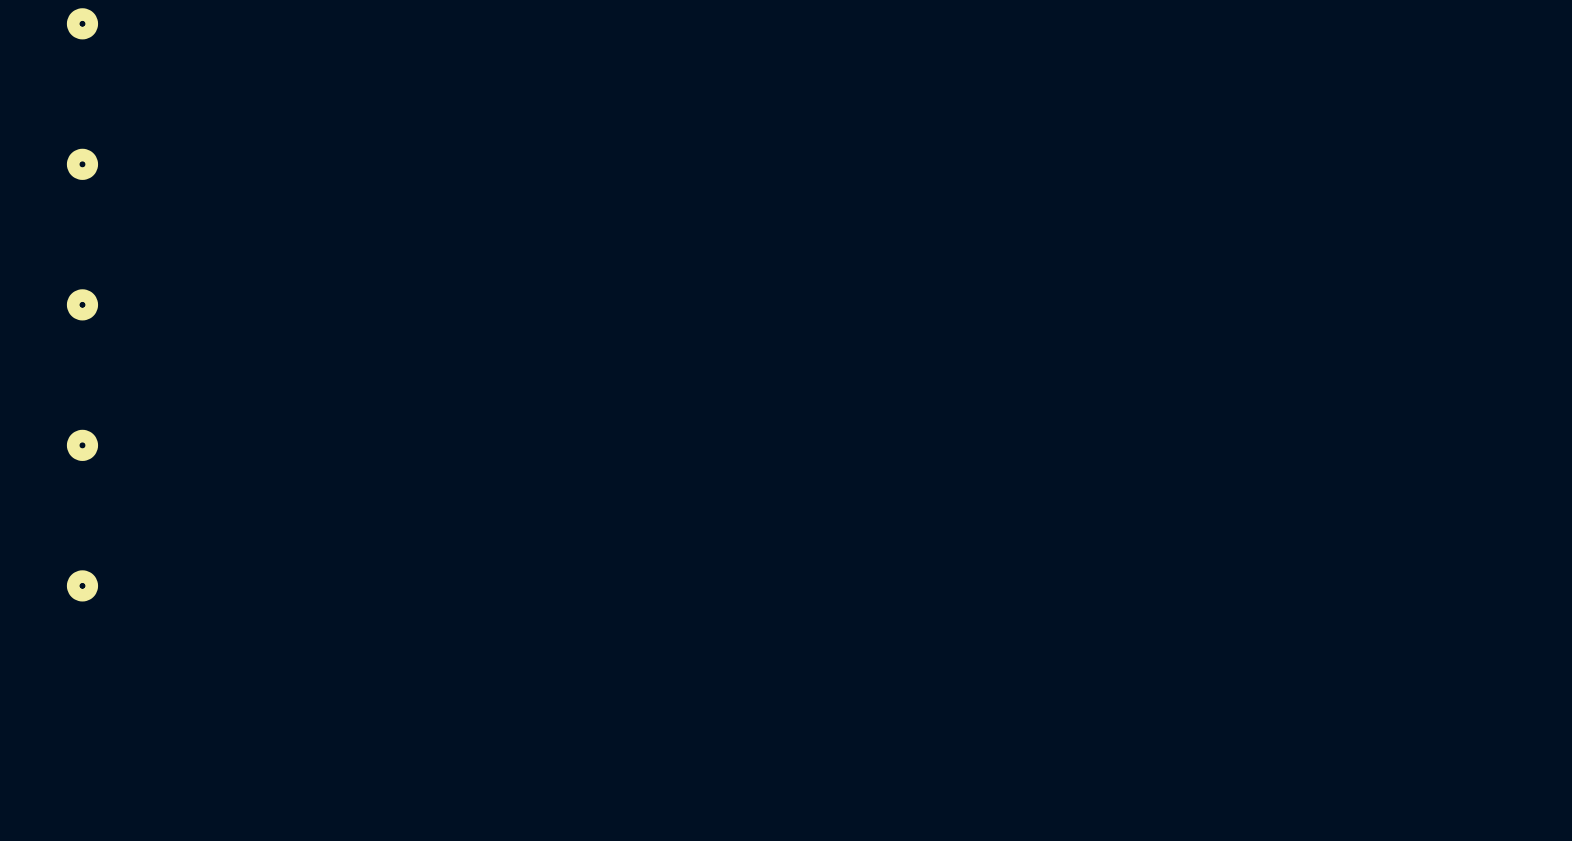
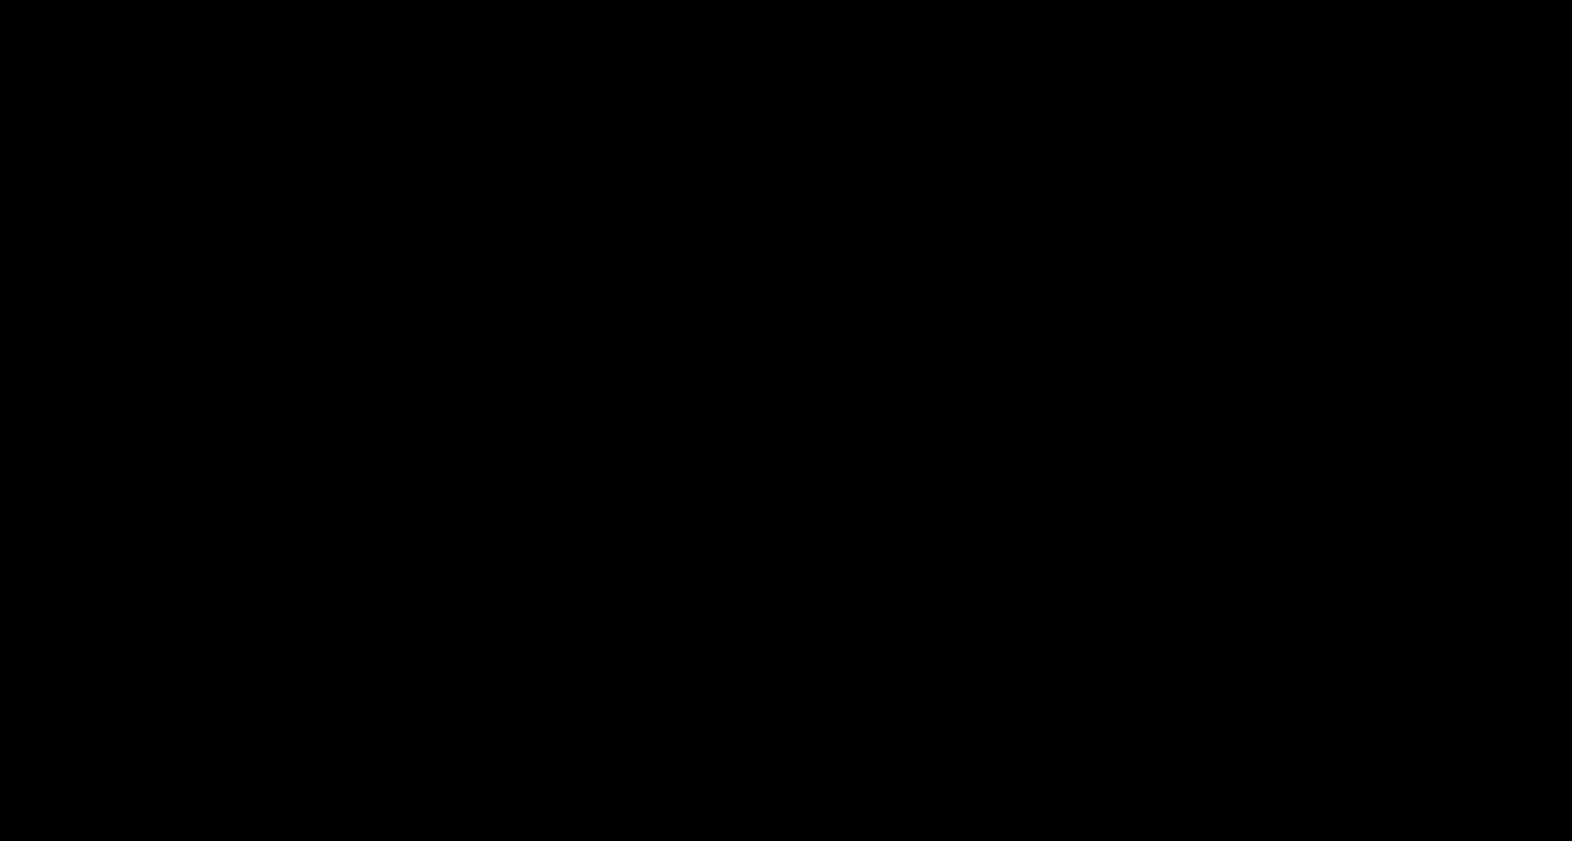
part: (82, 23) -> none
part: (82, 164) -> none
part: (82, 304) -> none
part: (82, 445) -> none
part: (82, 585) -> none

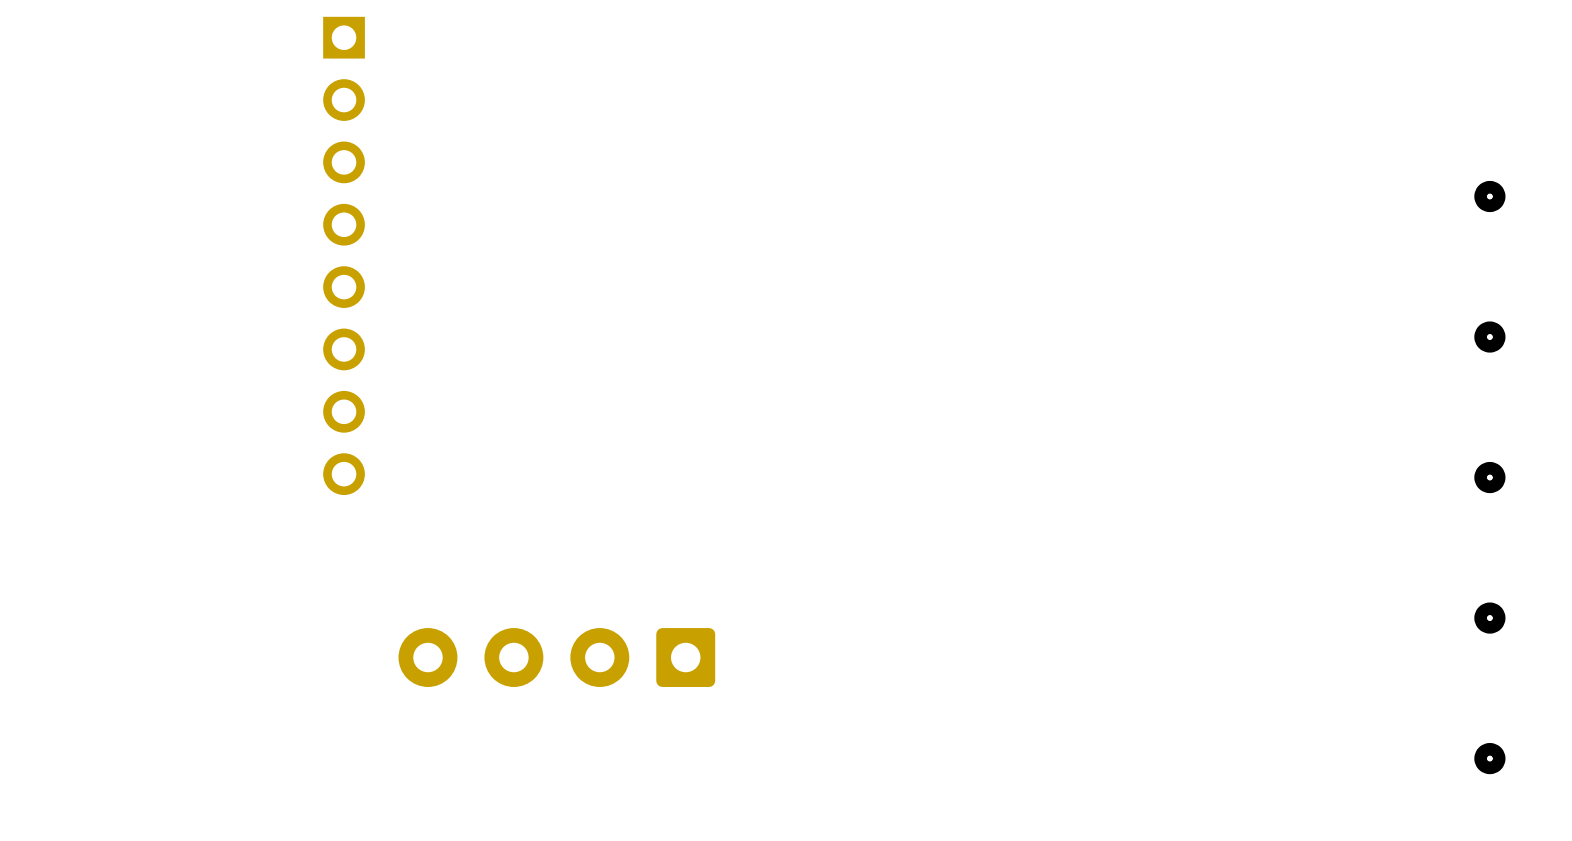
part: none -> (1489, 196)
part: none -> (344, 255)
part: none -> (1489, 337)
part: none -> (1489, 477)
part: none -> (1489, 618)
part: none -> (556, 657)
part: none -> (1489, 758)

